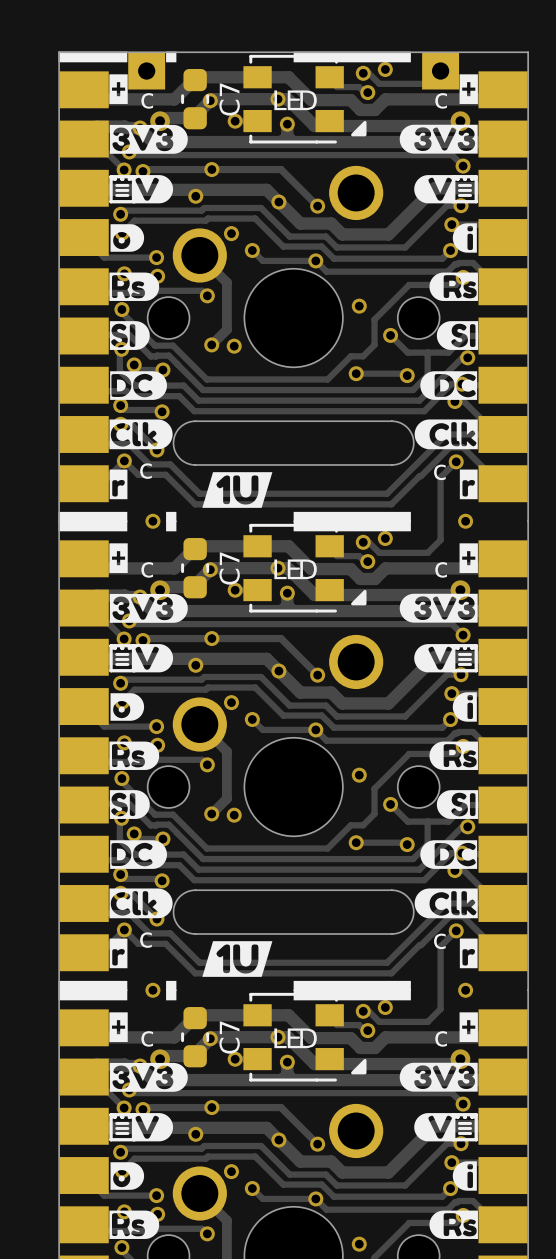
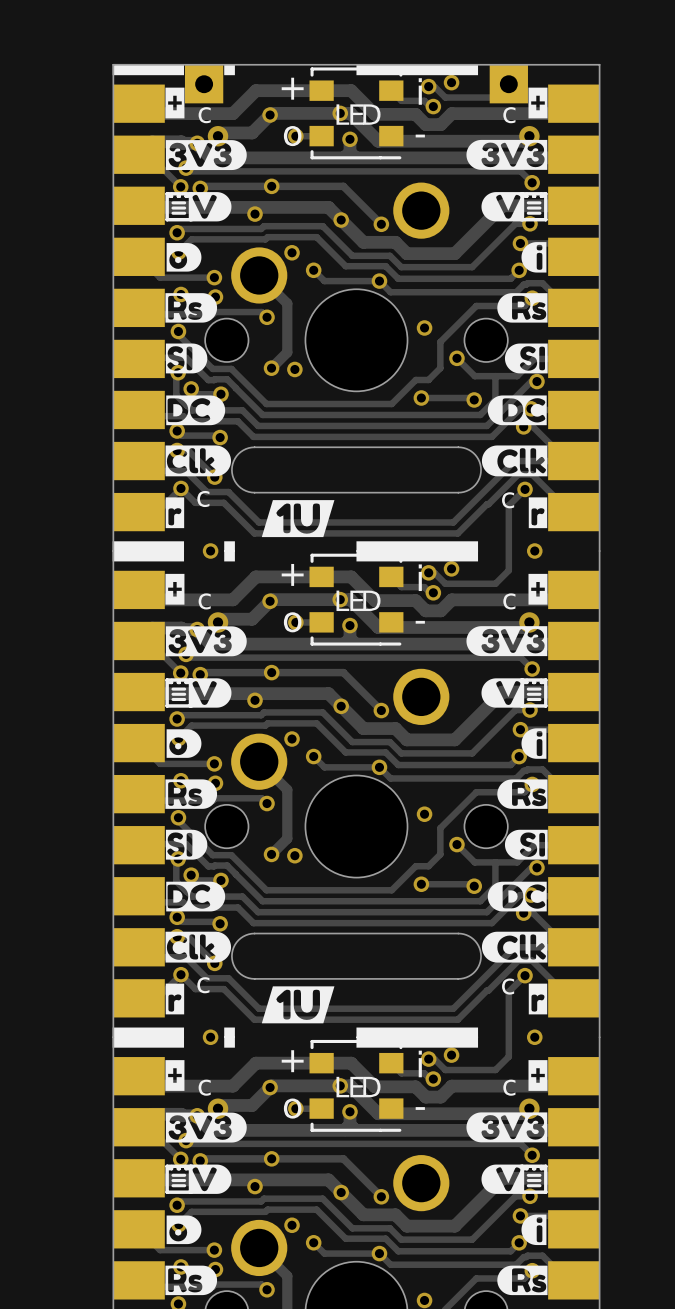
part footprint: [243, 54, 367, 144] -> [309, 67, 404, 160]
C7: (195, 99) -> none
part footprint: [243, 523, 367, 613] -> [309, 553, 404, 646]
C7: (195, 568) -> none
part footprint: [243, 992, 367, 1082] -> [309, 1039, 404, 1132]
C7: (195, 1037) -> none

